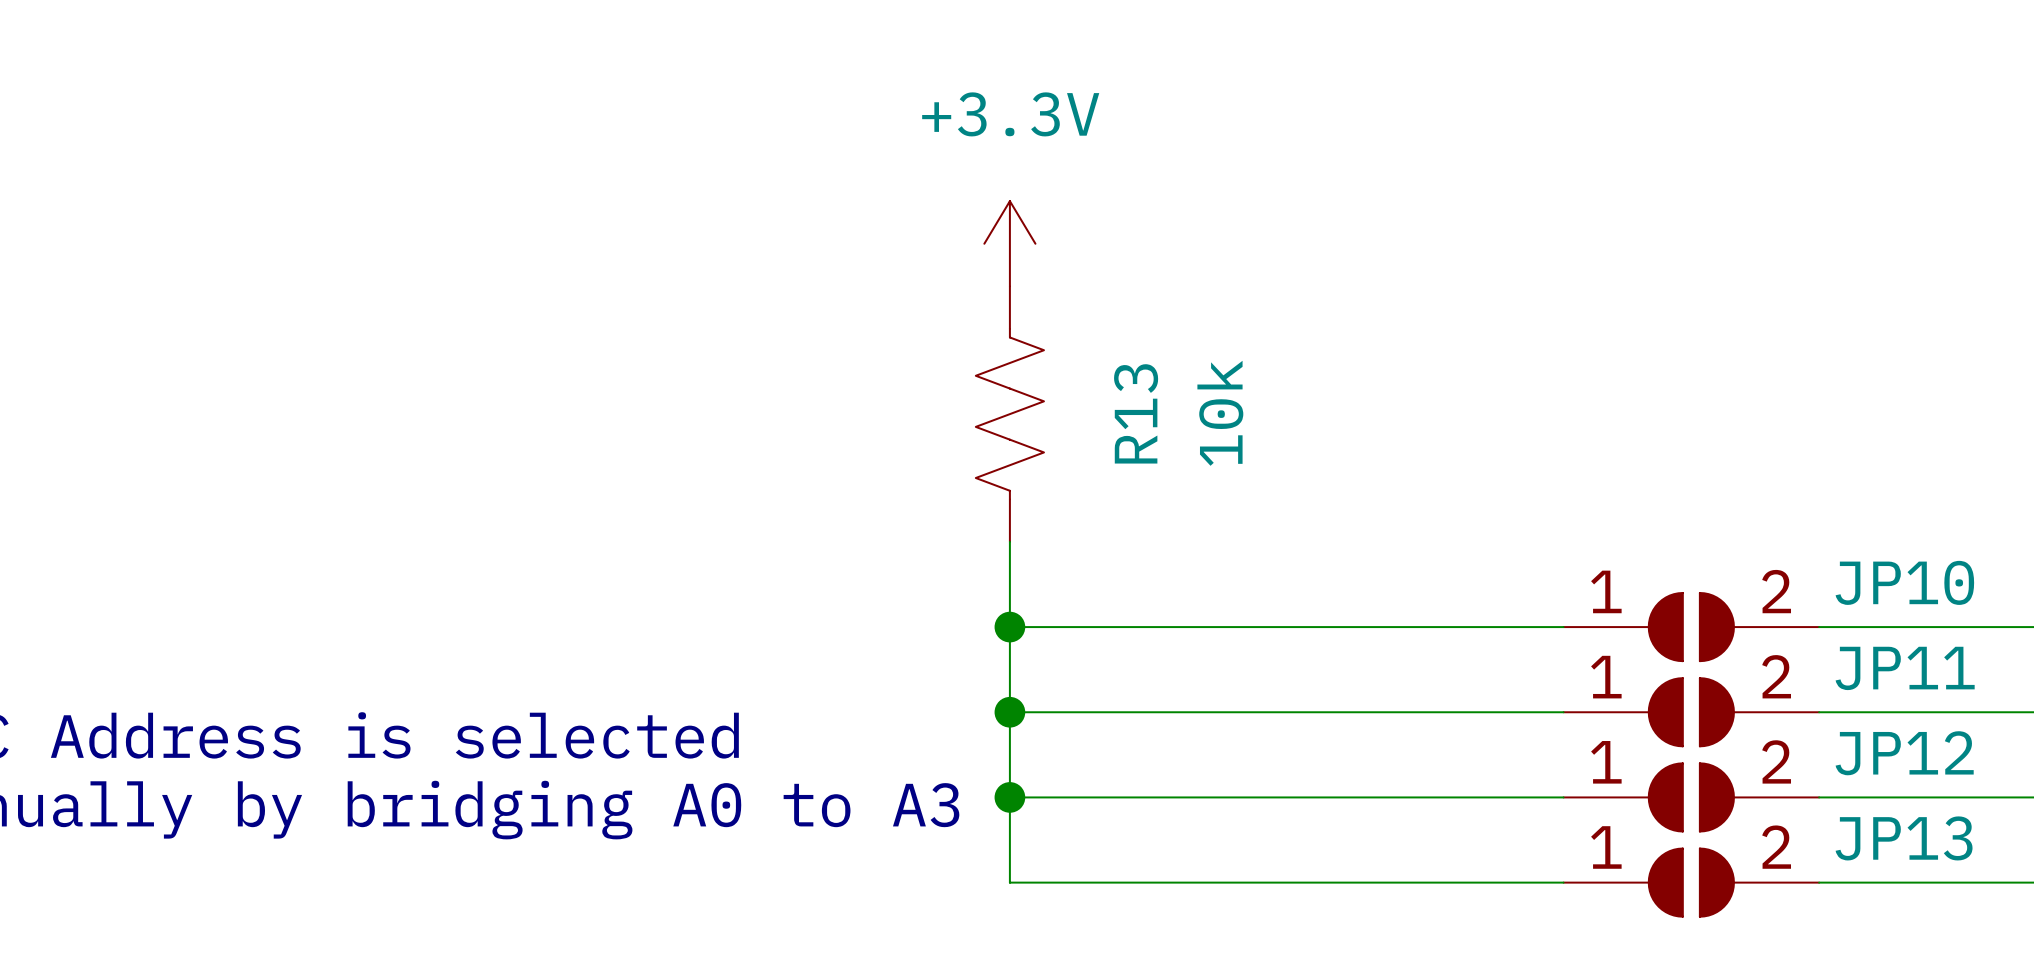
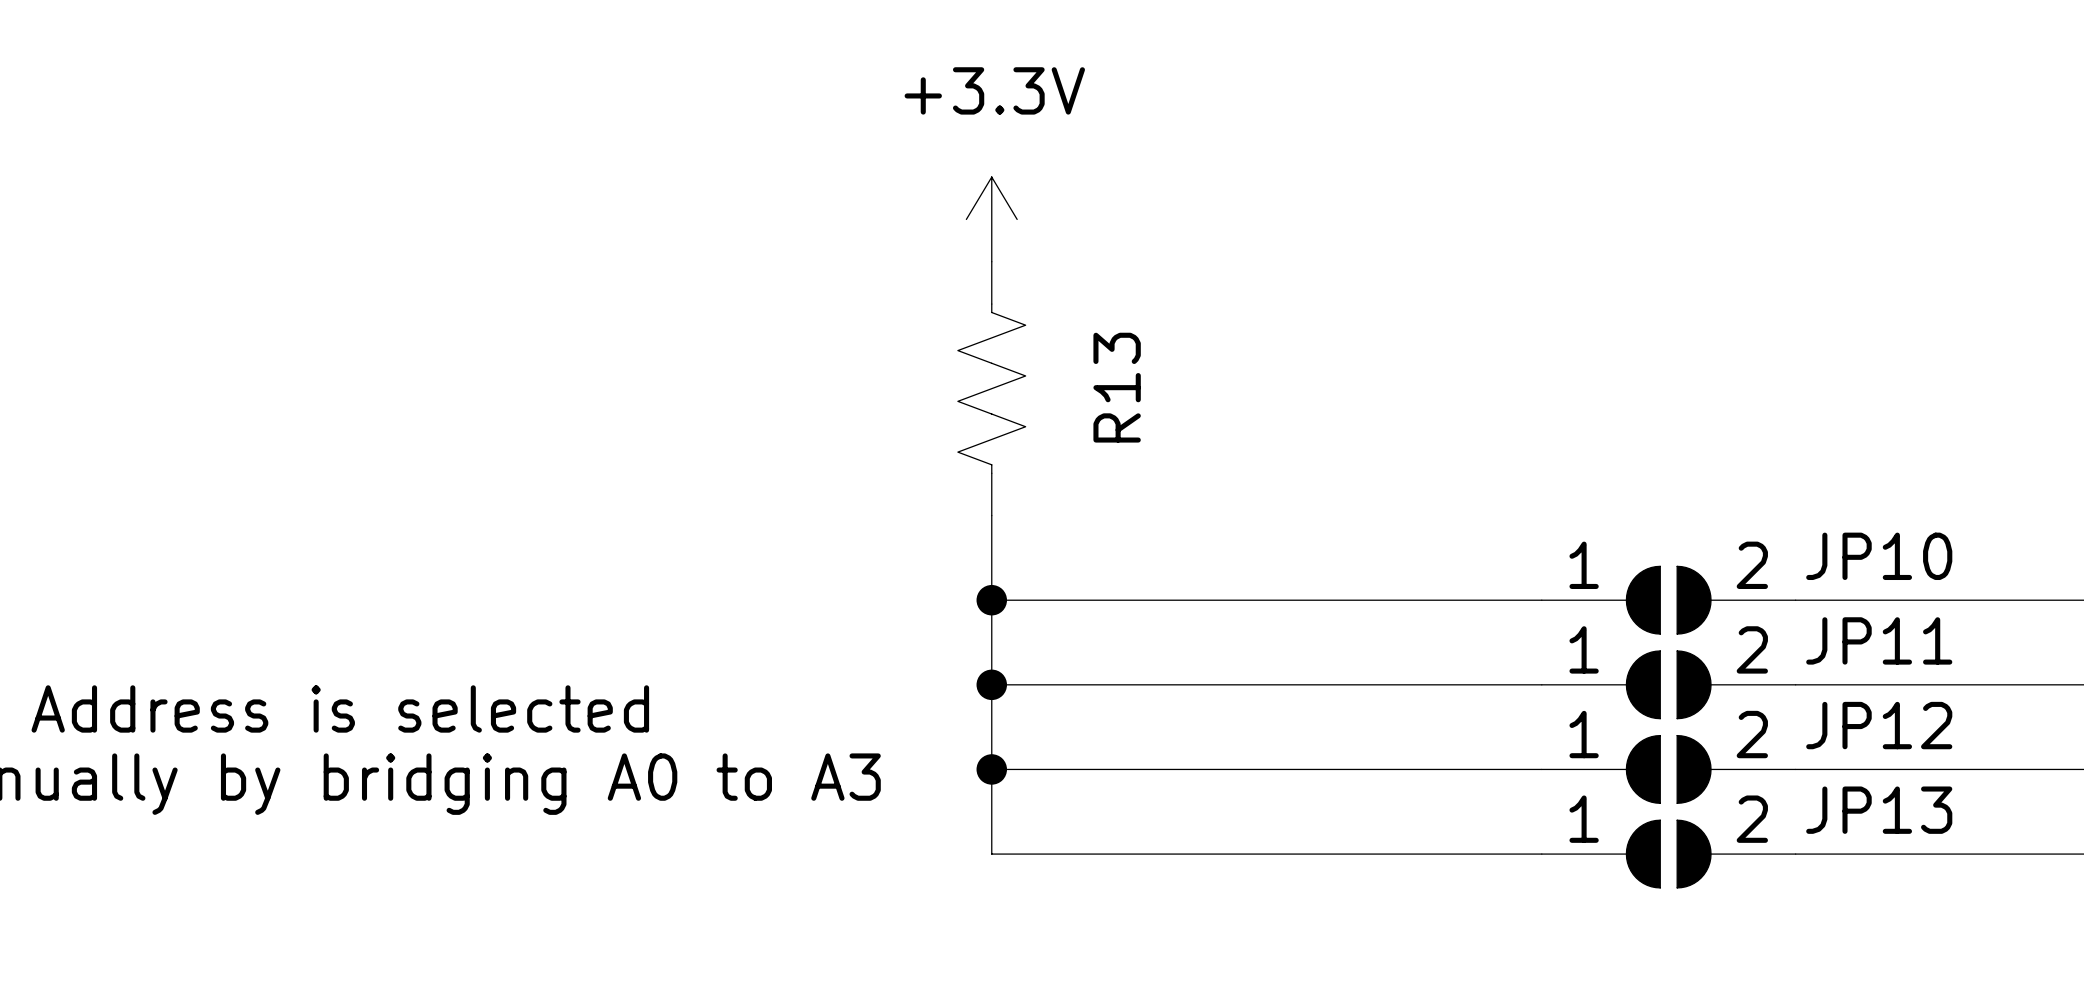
R13 value: 10k (1220, 413) -> none

